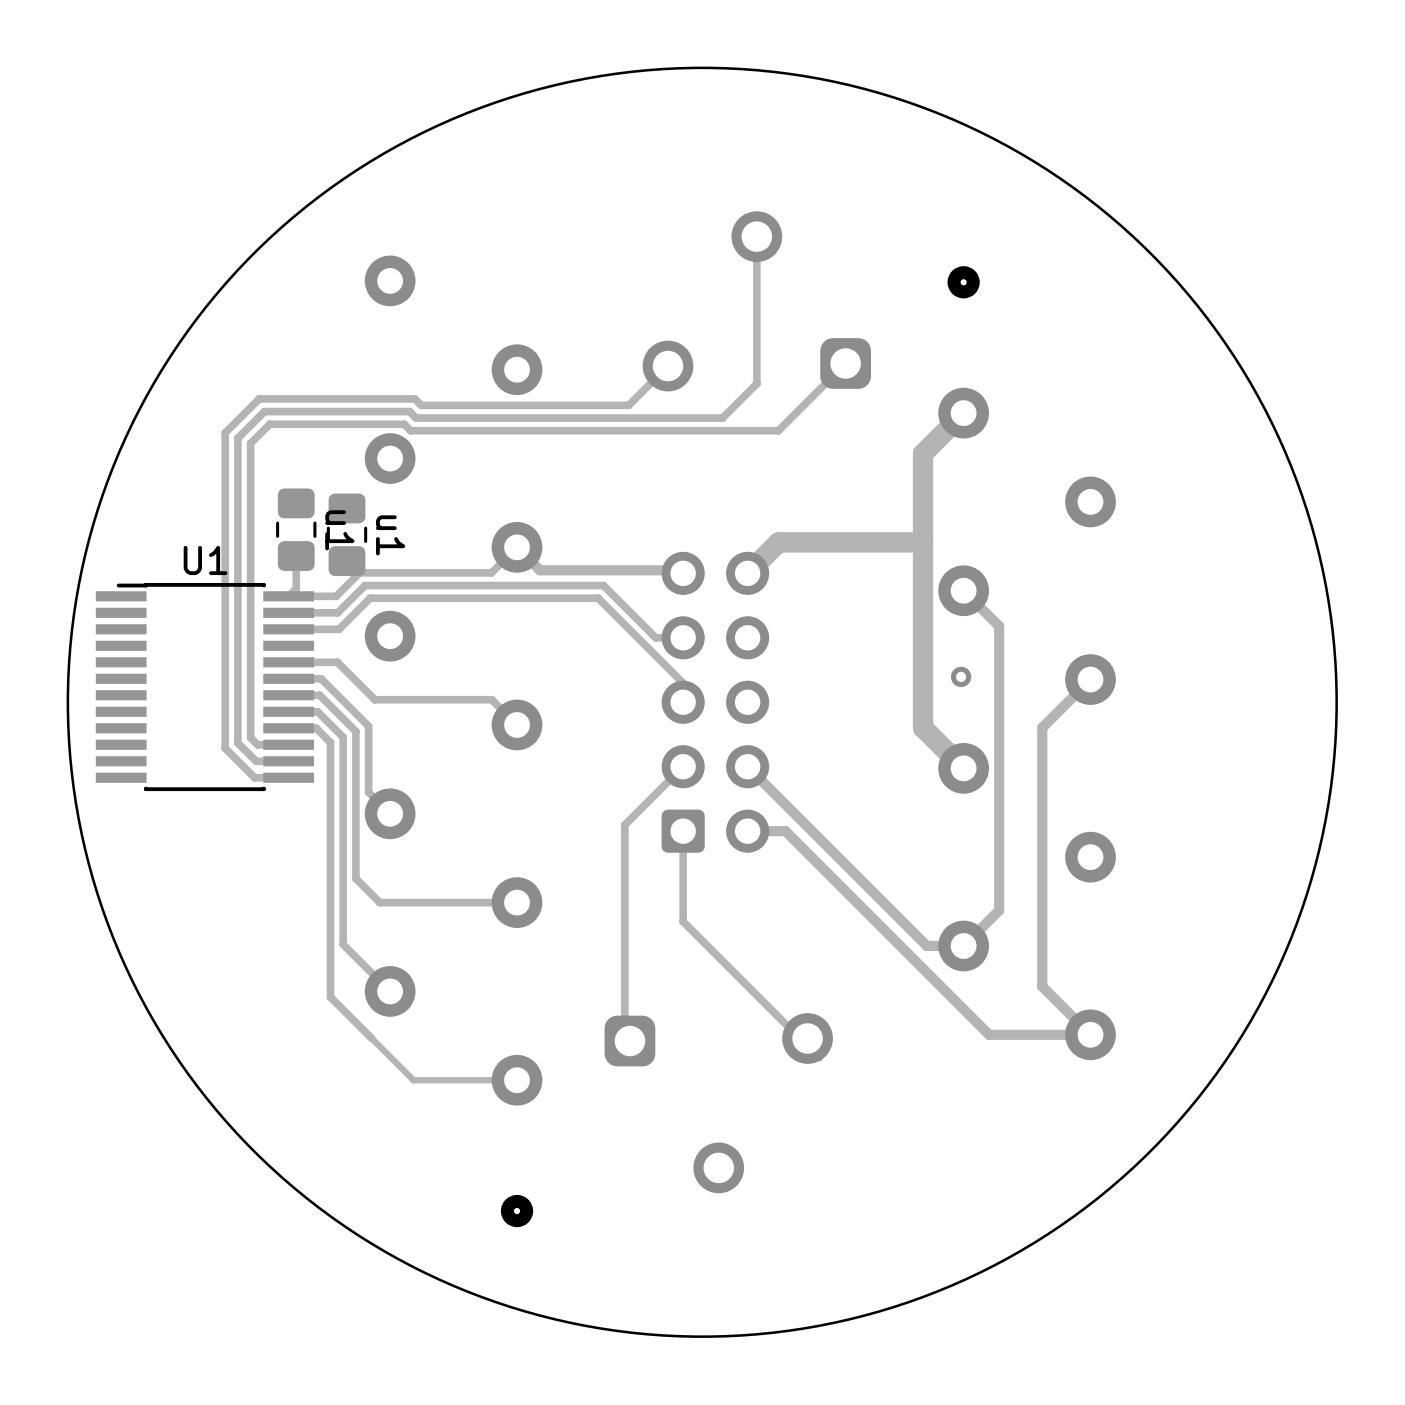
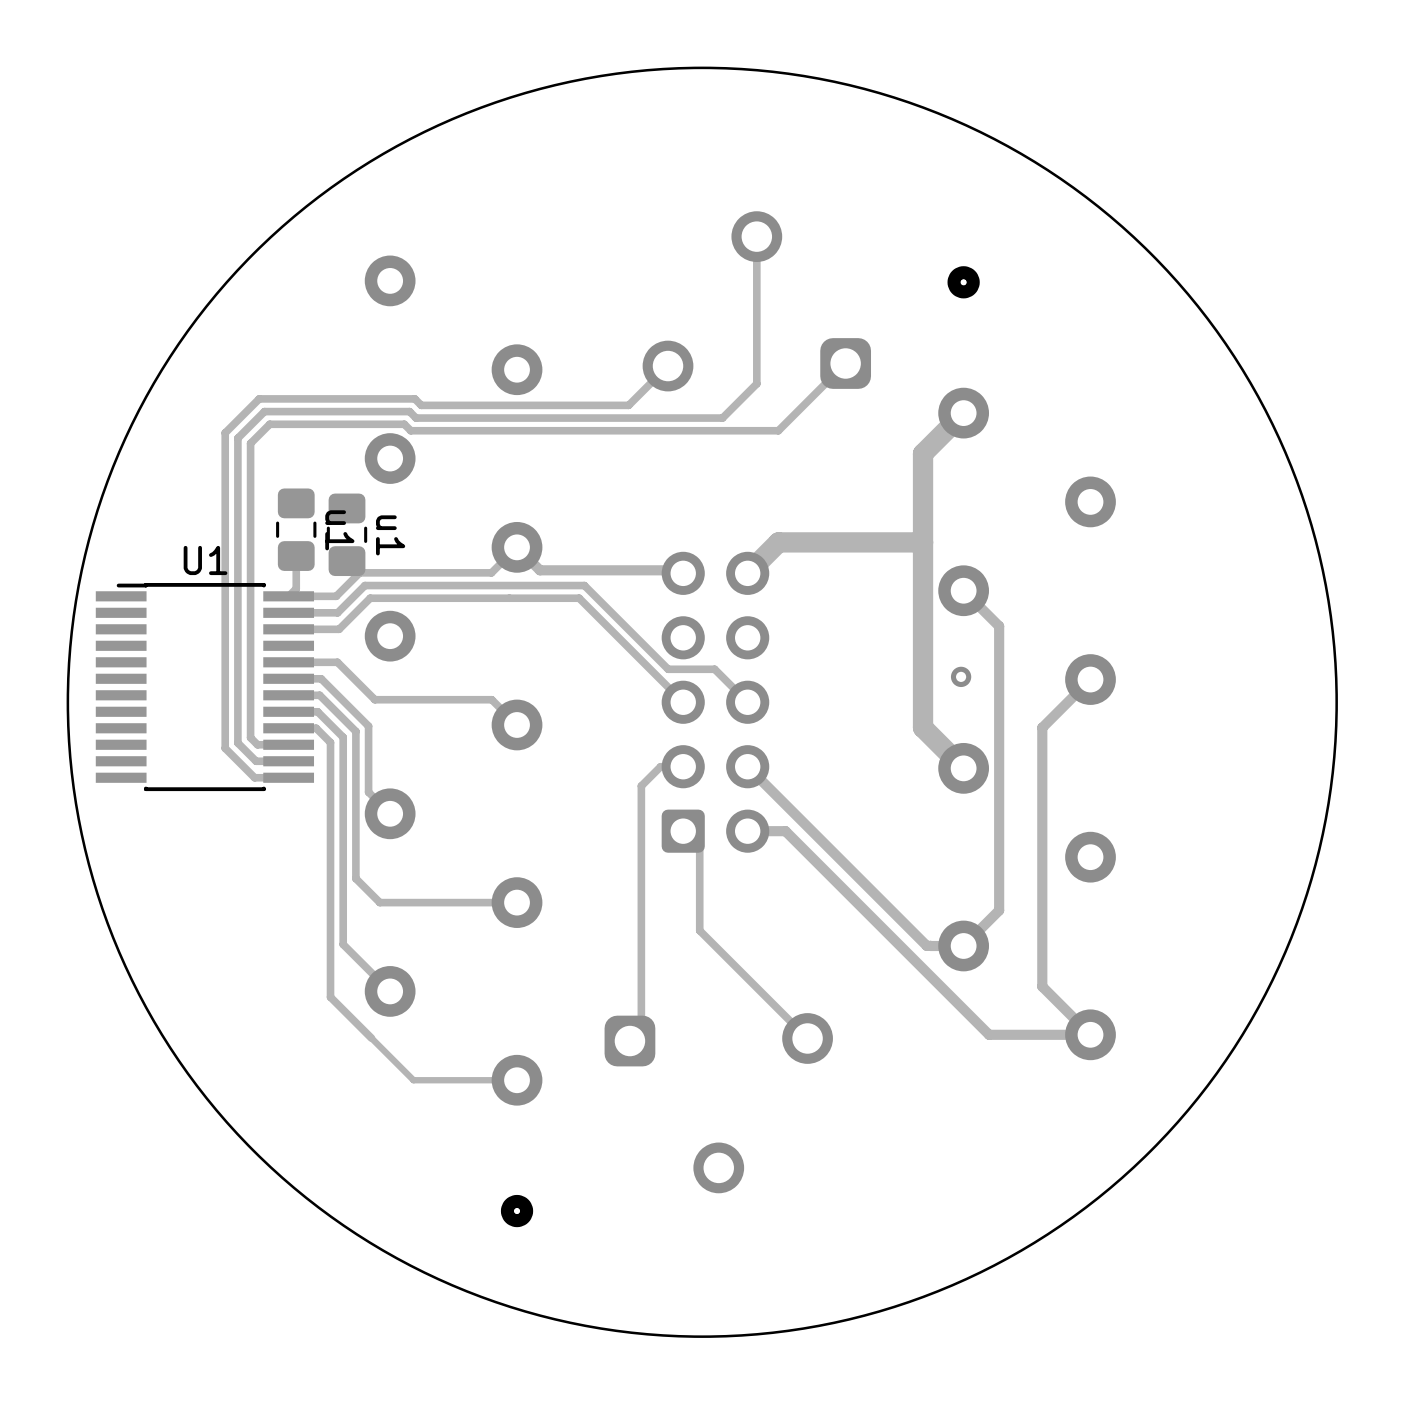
track: (584, 585) (603, 585) (655, 637) (683, 637) -> (584, 585) (668, 669) (714, 669) (747, 702)
track: (579, 598) (598, 598) (683, 683) (683, 702) -> (579, 598) (683, 702)
track: (683, 766) (624, 825) (624, 1041) -> (683, 766) (660, 766) (641, 786) (641, 1029) (629, 1041)
track: (683, 831) (683, 921) (818, 1057) (818, 1054) (802, 1038) -> (683, 831) (699, 847) (699, 930) (807, 1038)

